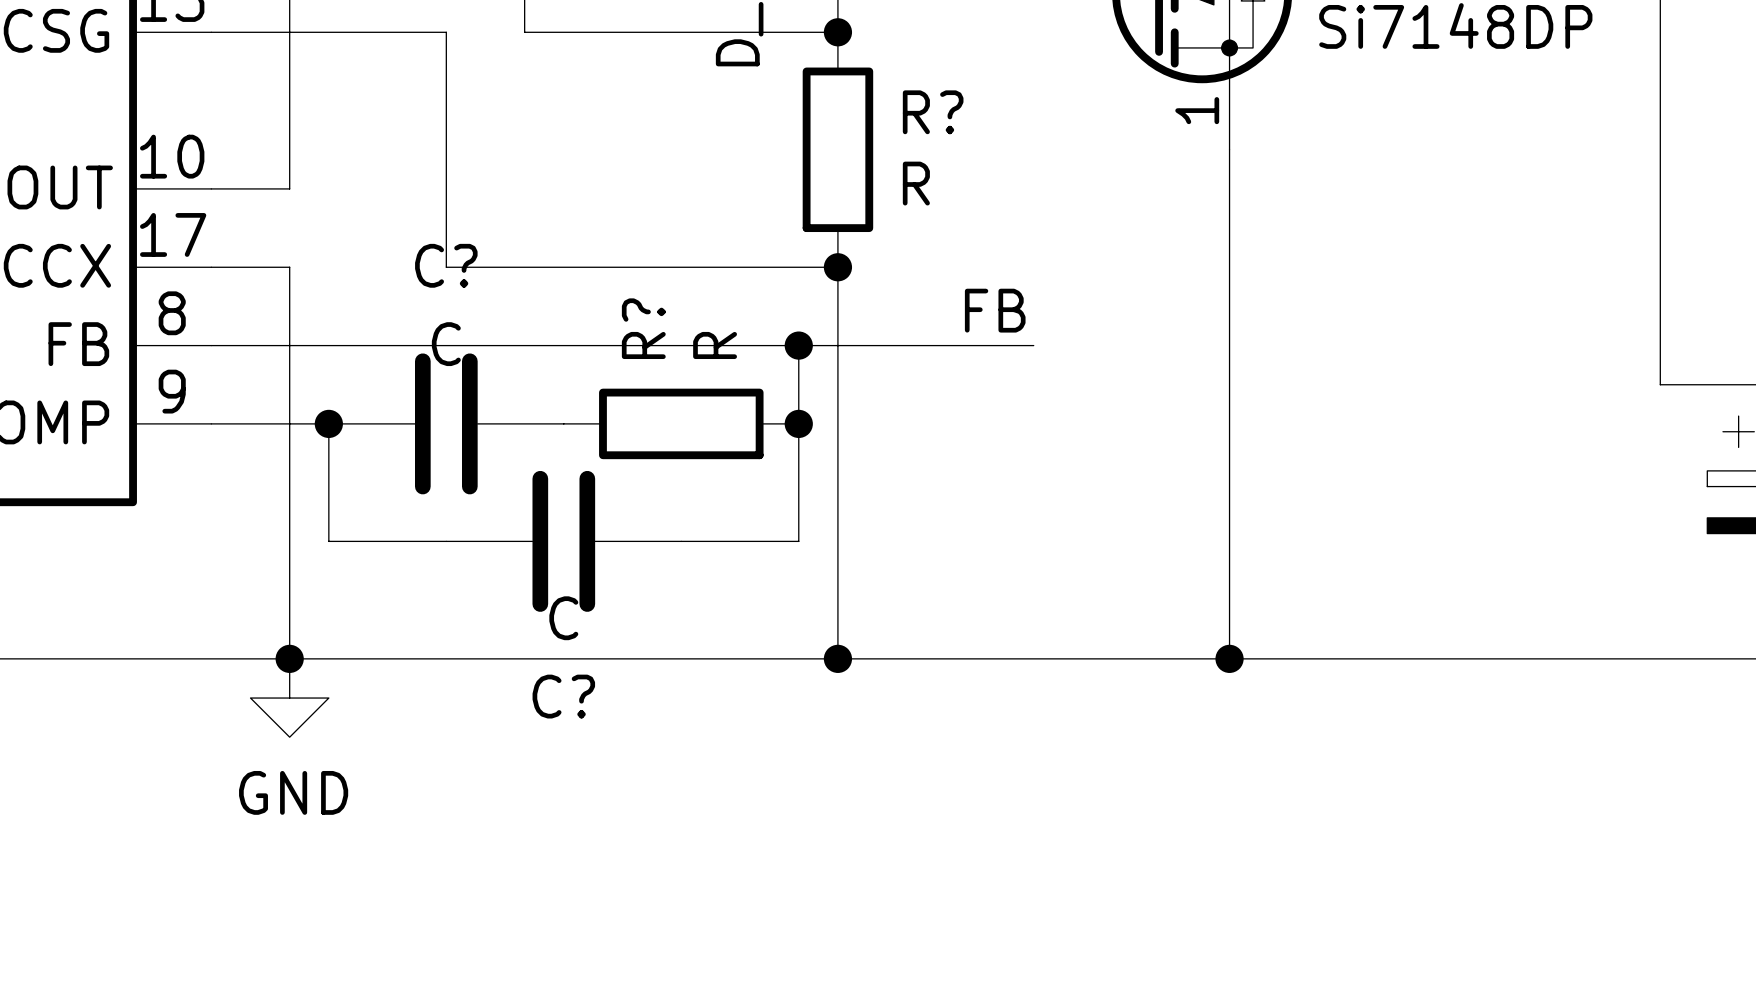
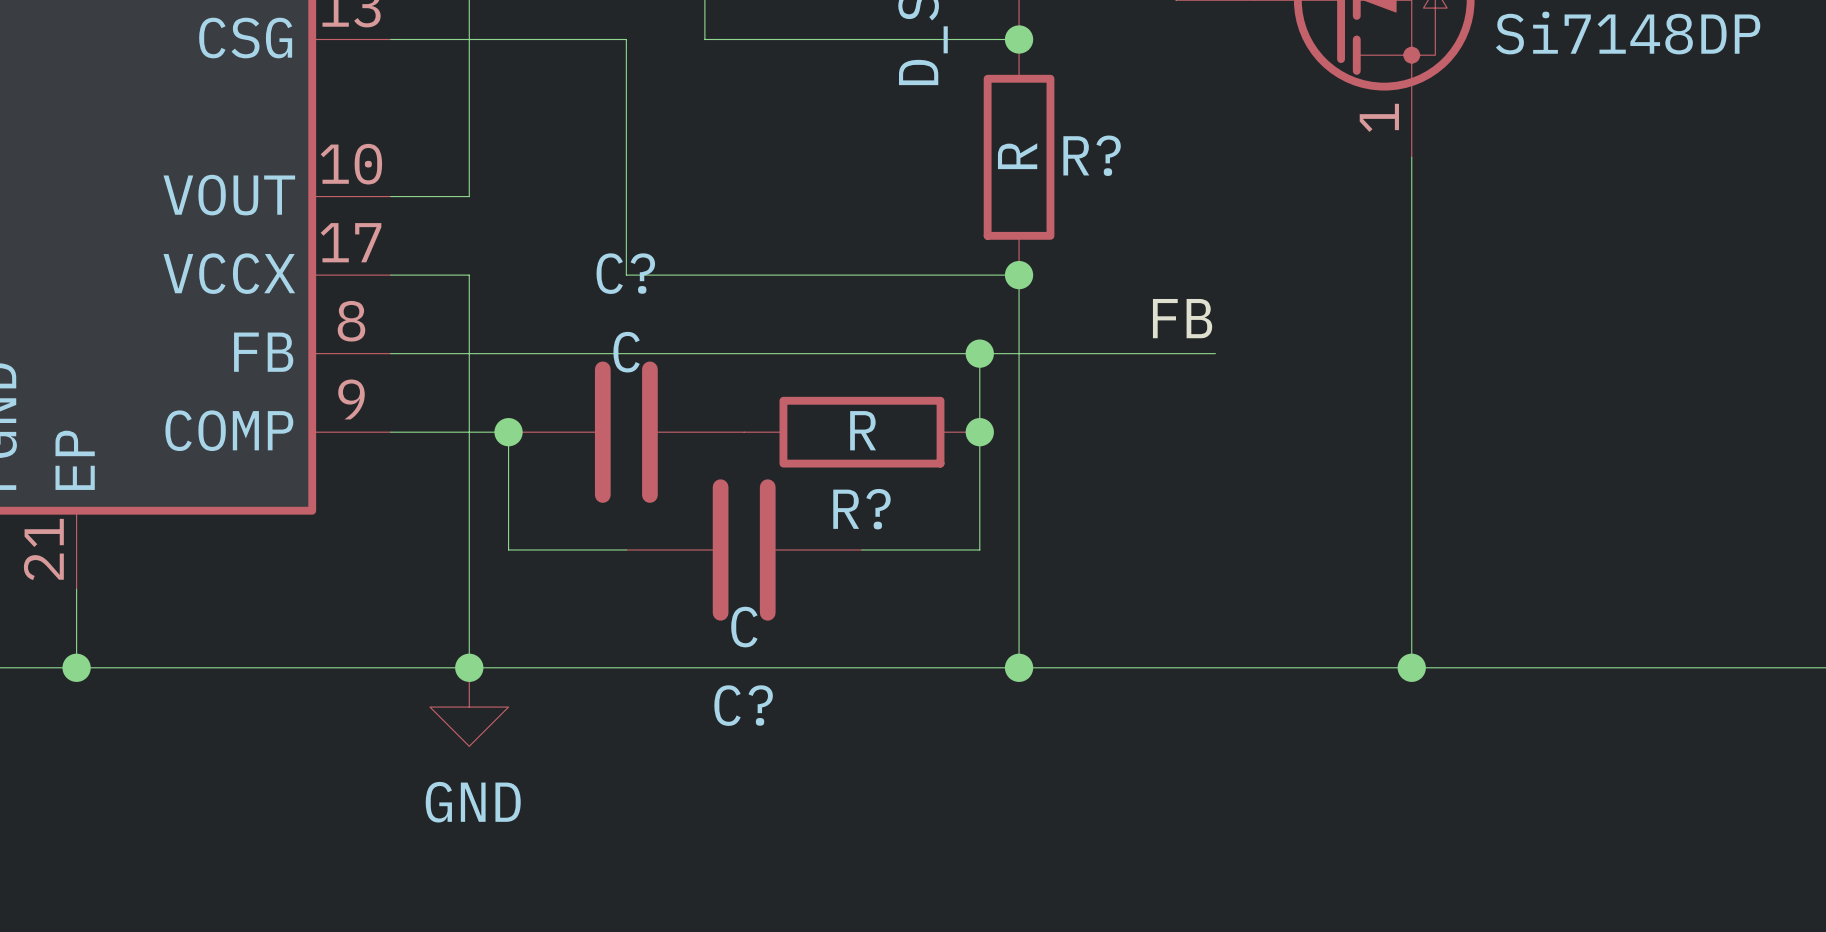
R? name position: R? (933, 112) -> R? (1092, 155)
R? value rotation: 0° (916, 183) -> 90° counterclockwise (1017, 156)
R? value position: R (916, 183) -> R (1017, 156)
R? name rotation: 0° (643, 328) -> 90° clockwise (861, 509)
R? name position: R? (643, 328) -> R? (861, 509)
R? value rotation: 0° (715, 345) -> 90° clockwise (863, 430)
R? value position: R (715, 345) -> R (863, 430)

